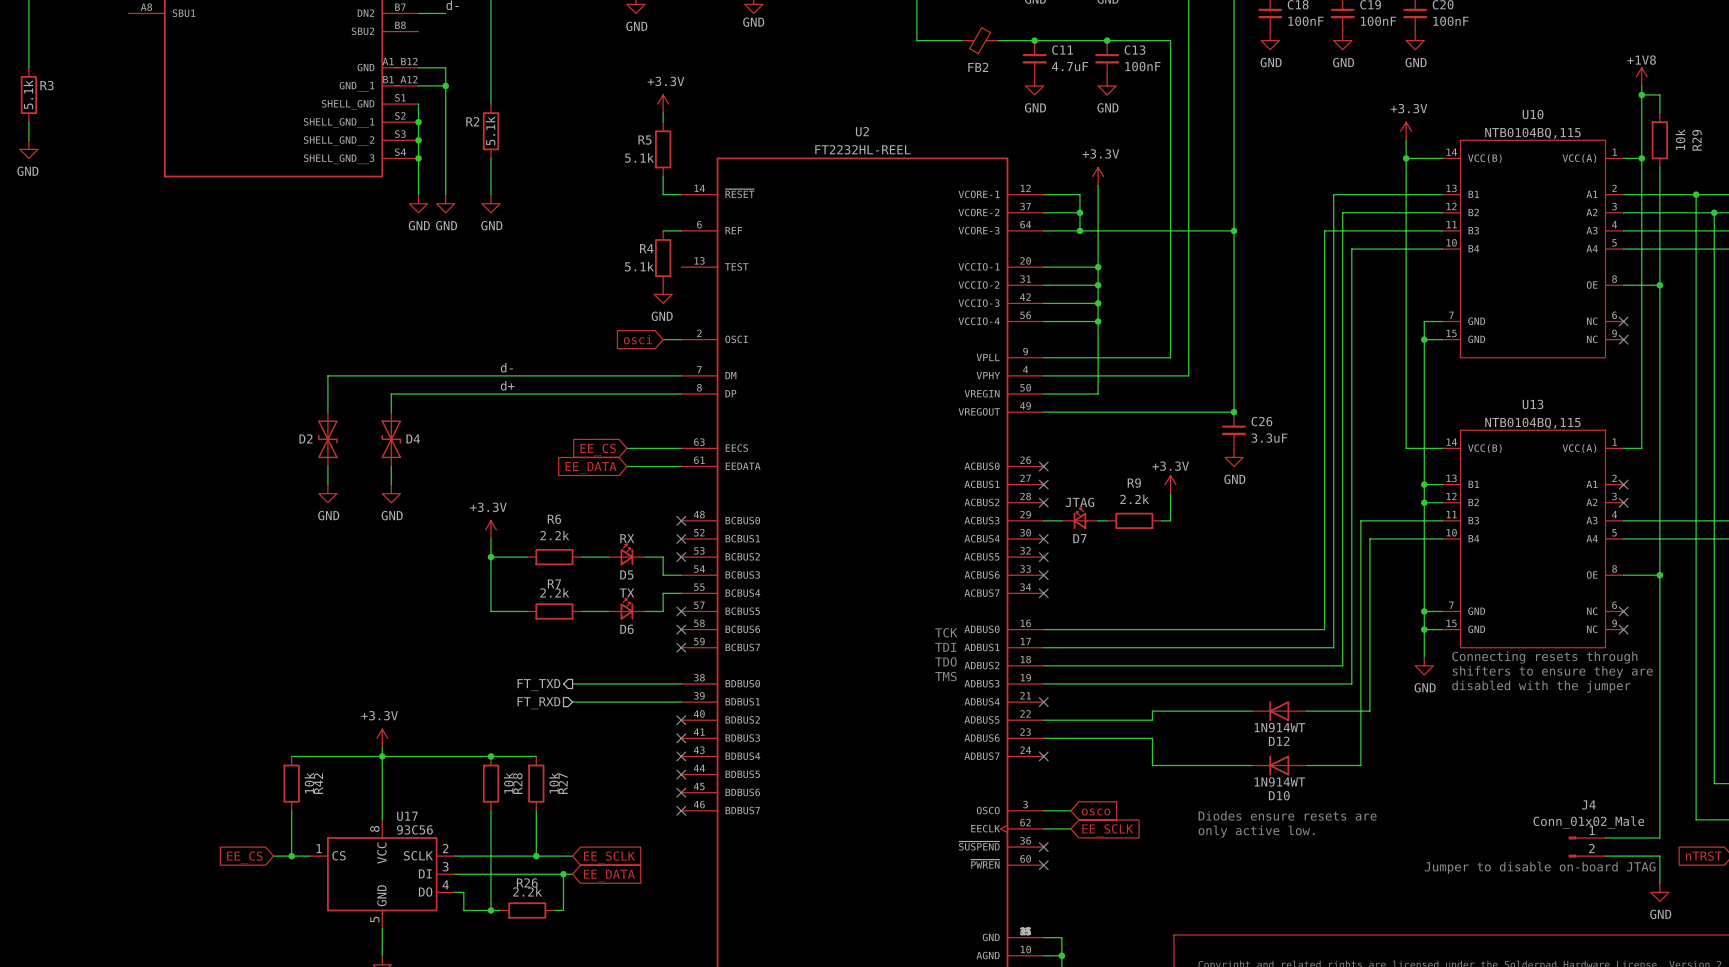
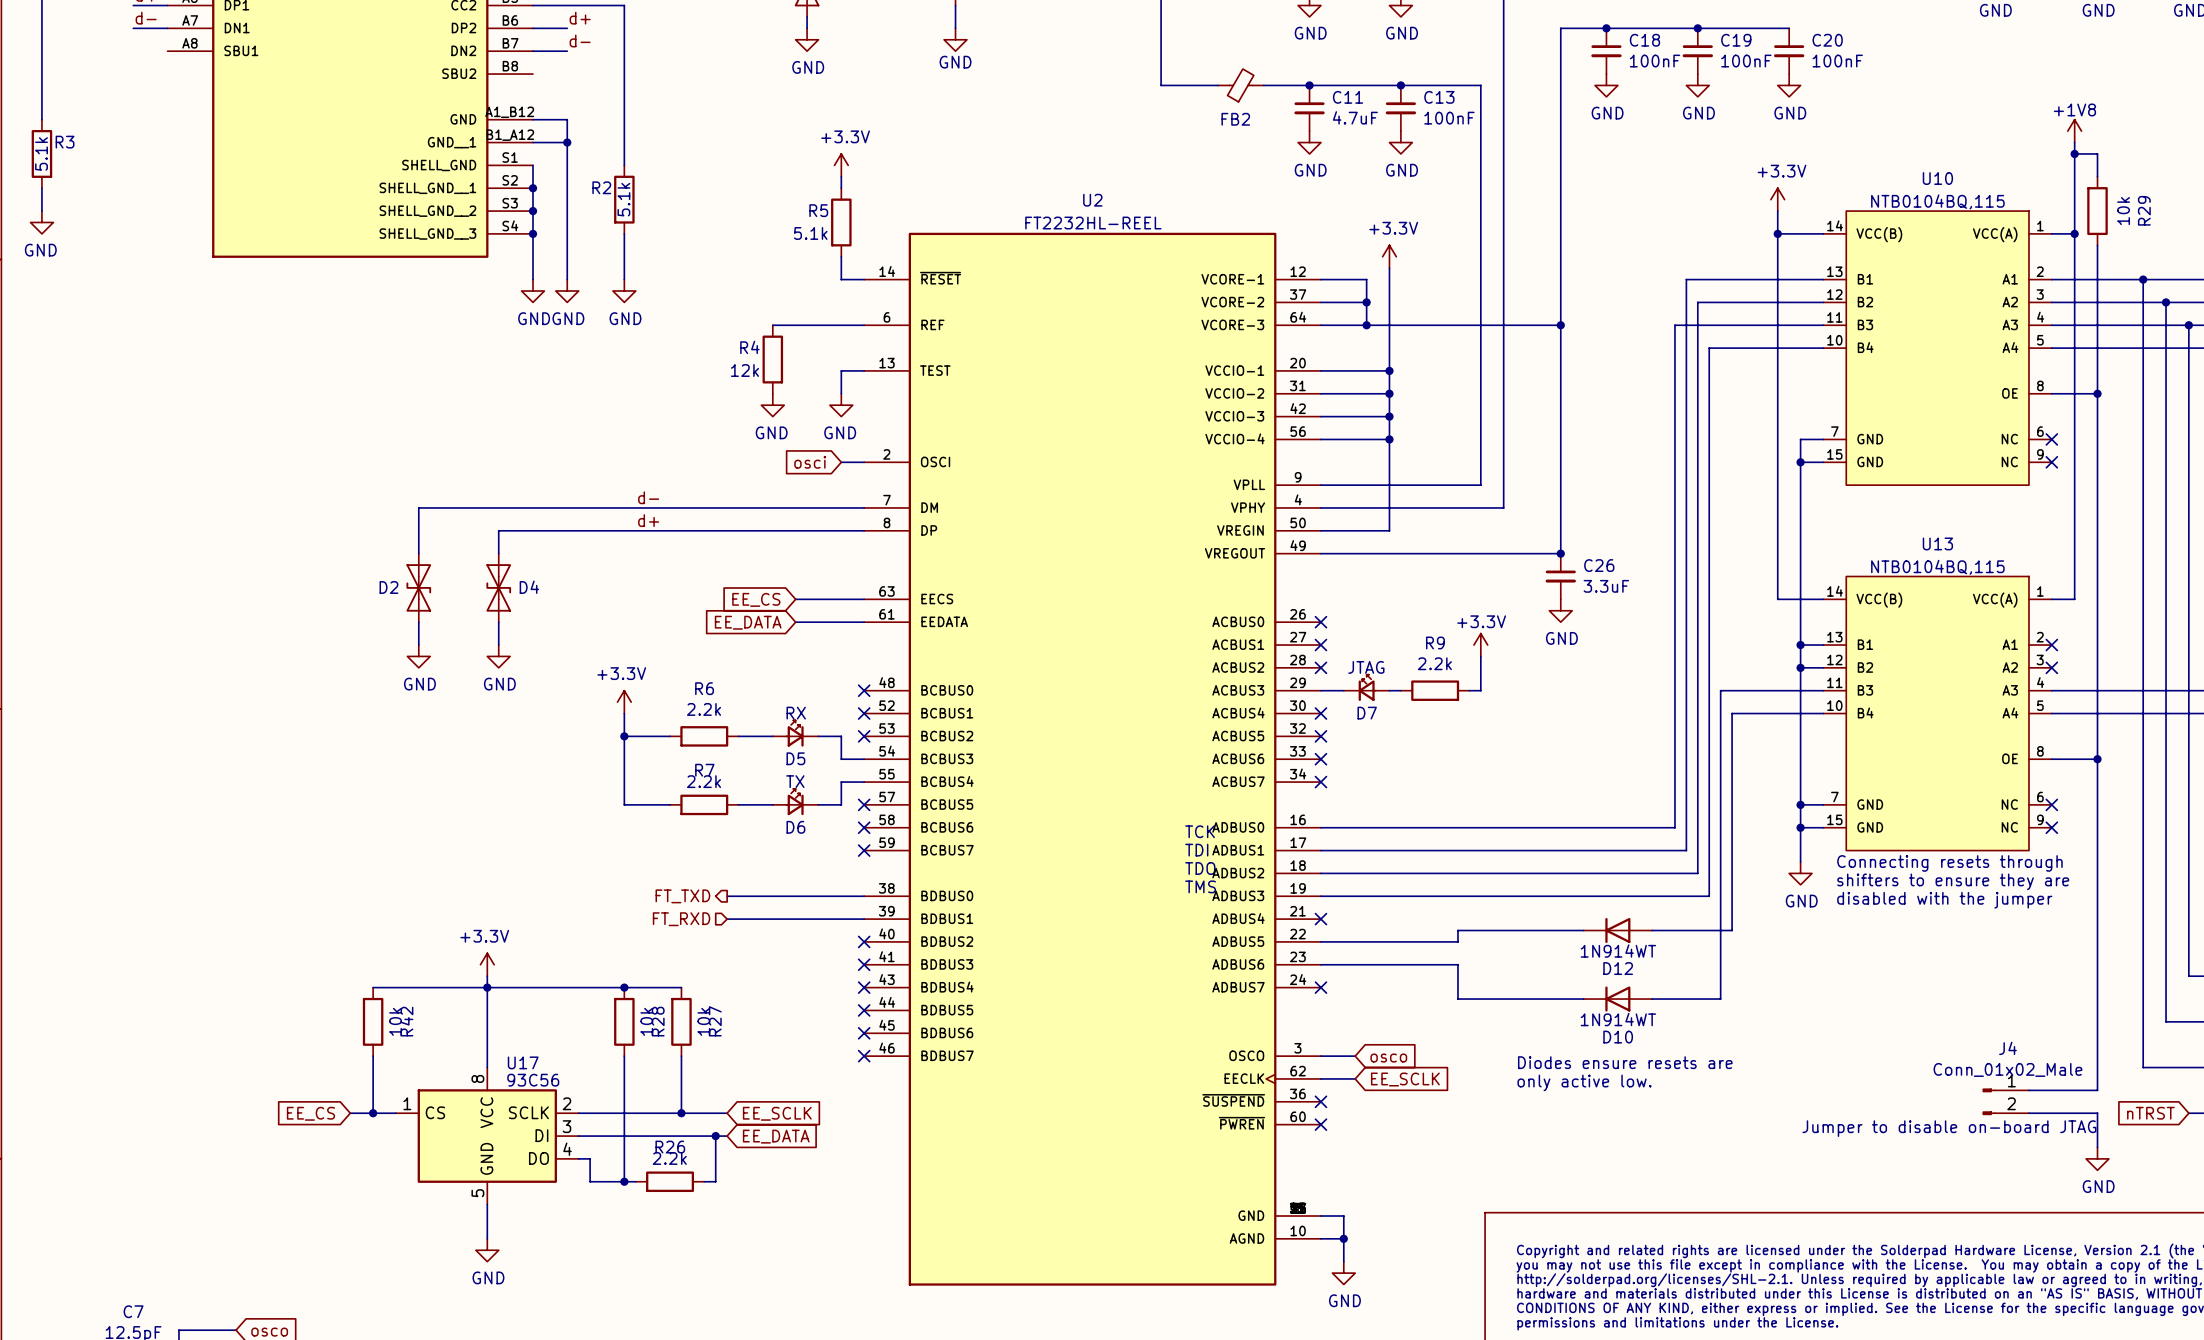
wire: none -> (772, 325) (841, 325)
R4 position: (663, 258) -> (772, 359)
R4 value: 5.1k (639, 266) -> 12k (744, 370)
wire: none -> (864, 370) (841, 370) (841, 393)
power symbol: none -> GND (772, 405)

